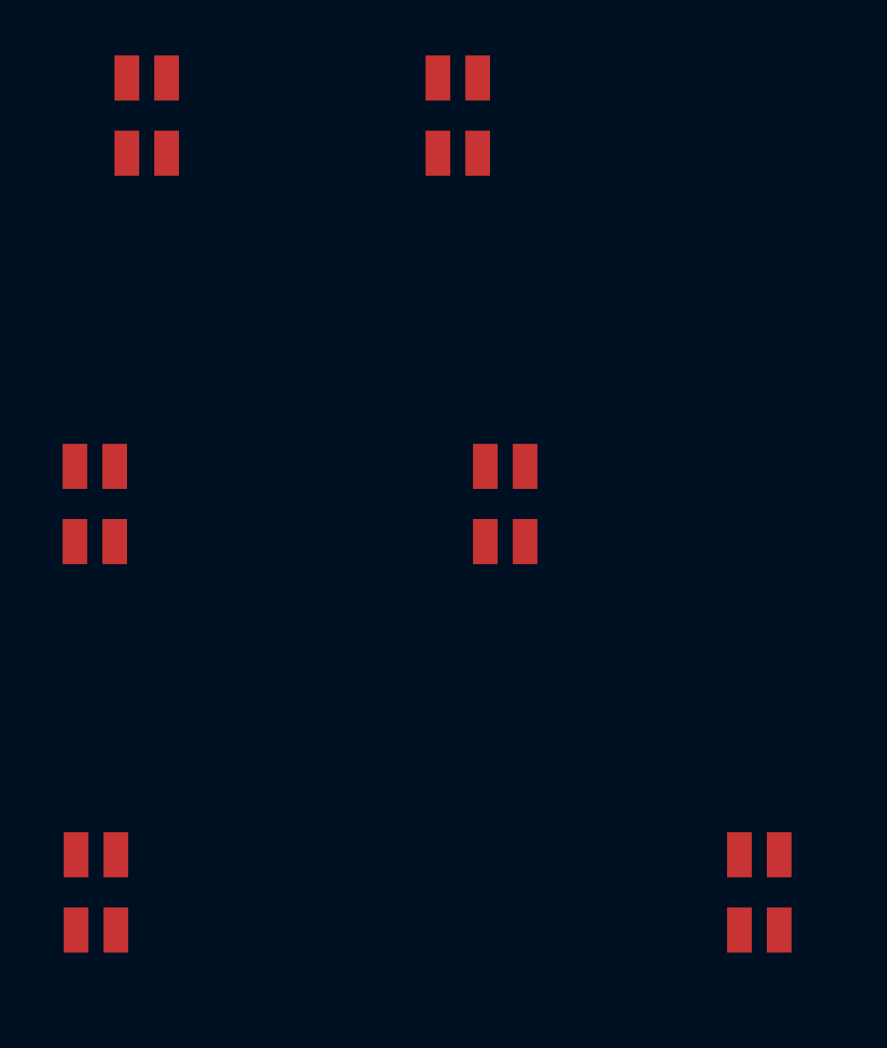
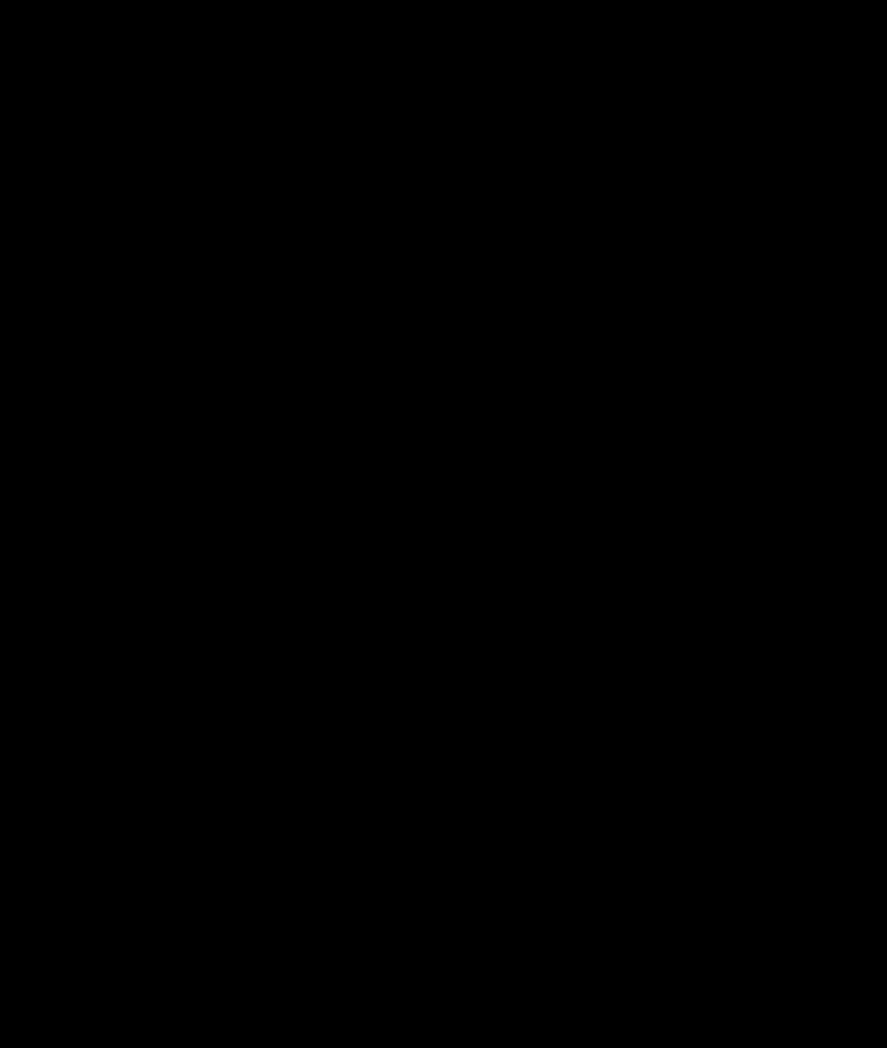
part: (146, 115) -> none
part: (457, 115) -> none
part: (94, 503) -> none
part: (505, 503) -> none
part: (95, 892) -> none
part: (759, 892) -> none

